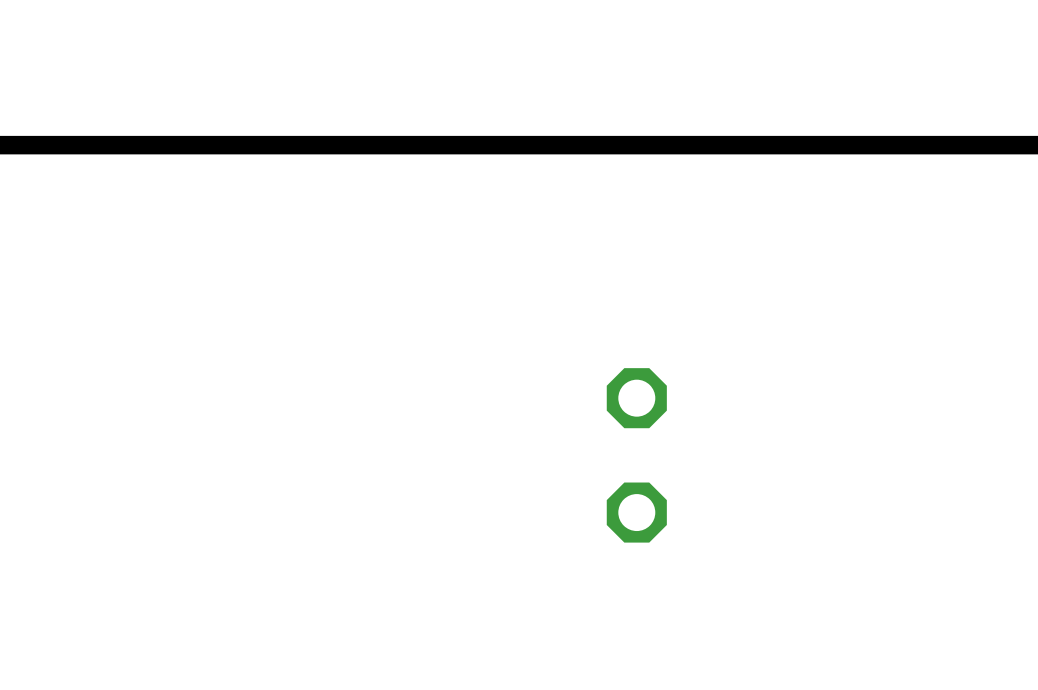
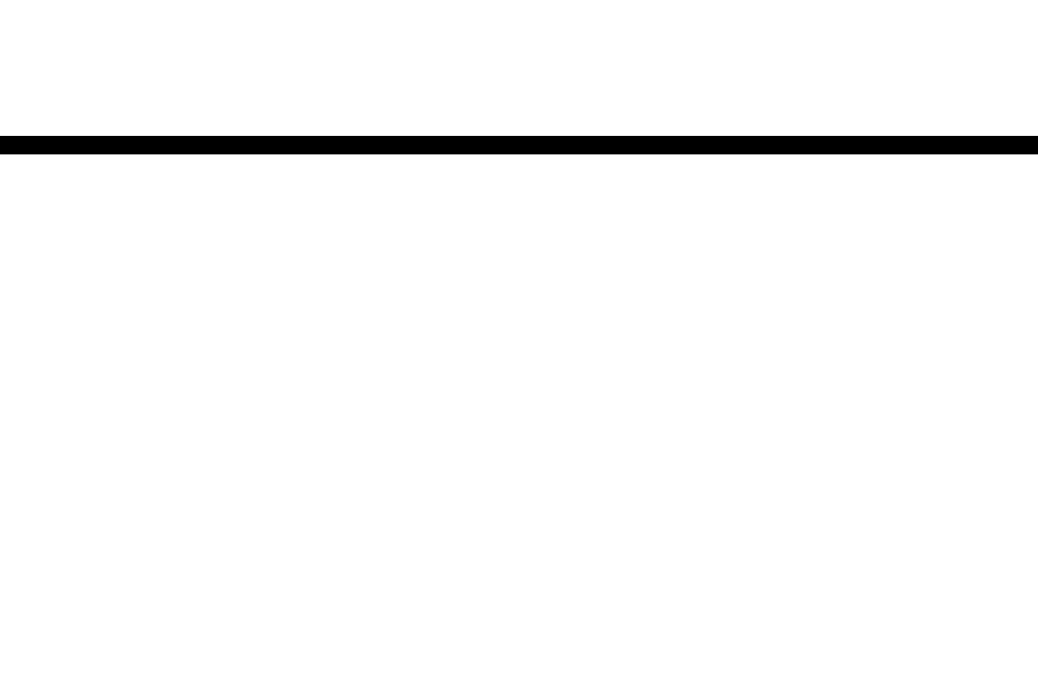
part: (636, 455) -> none

